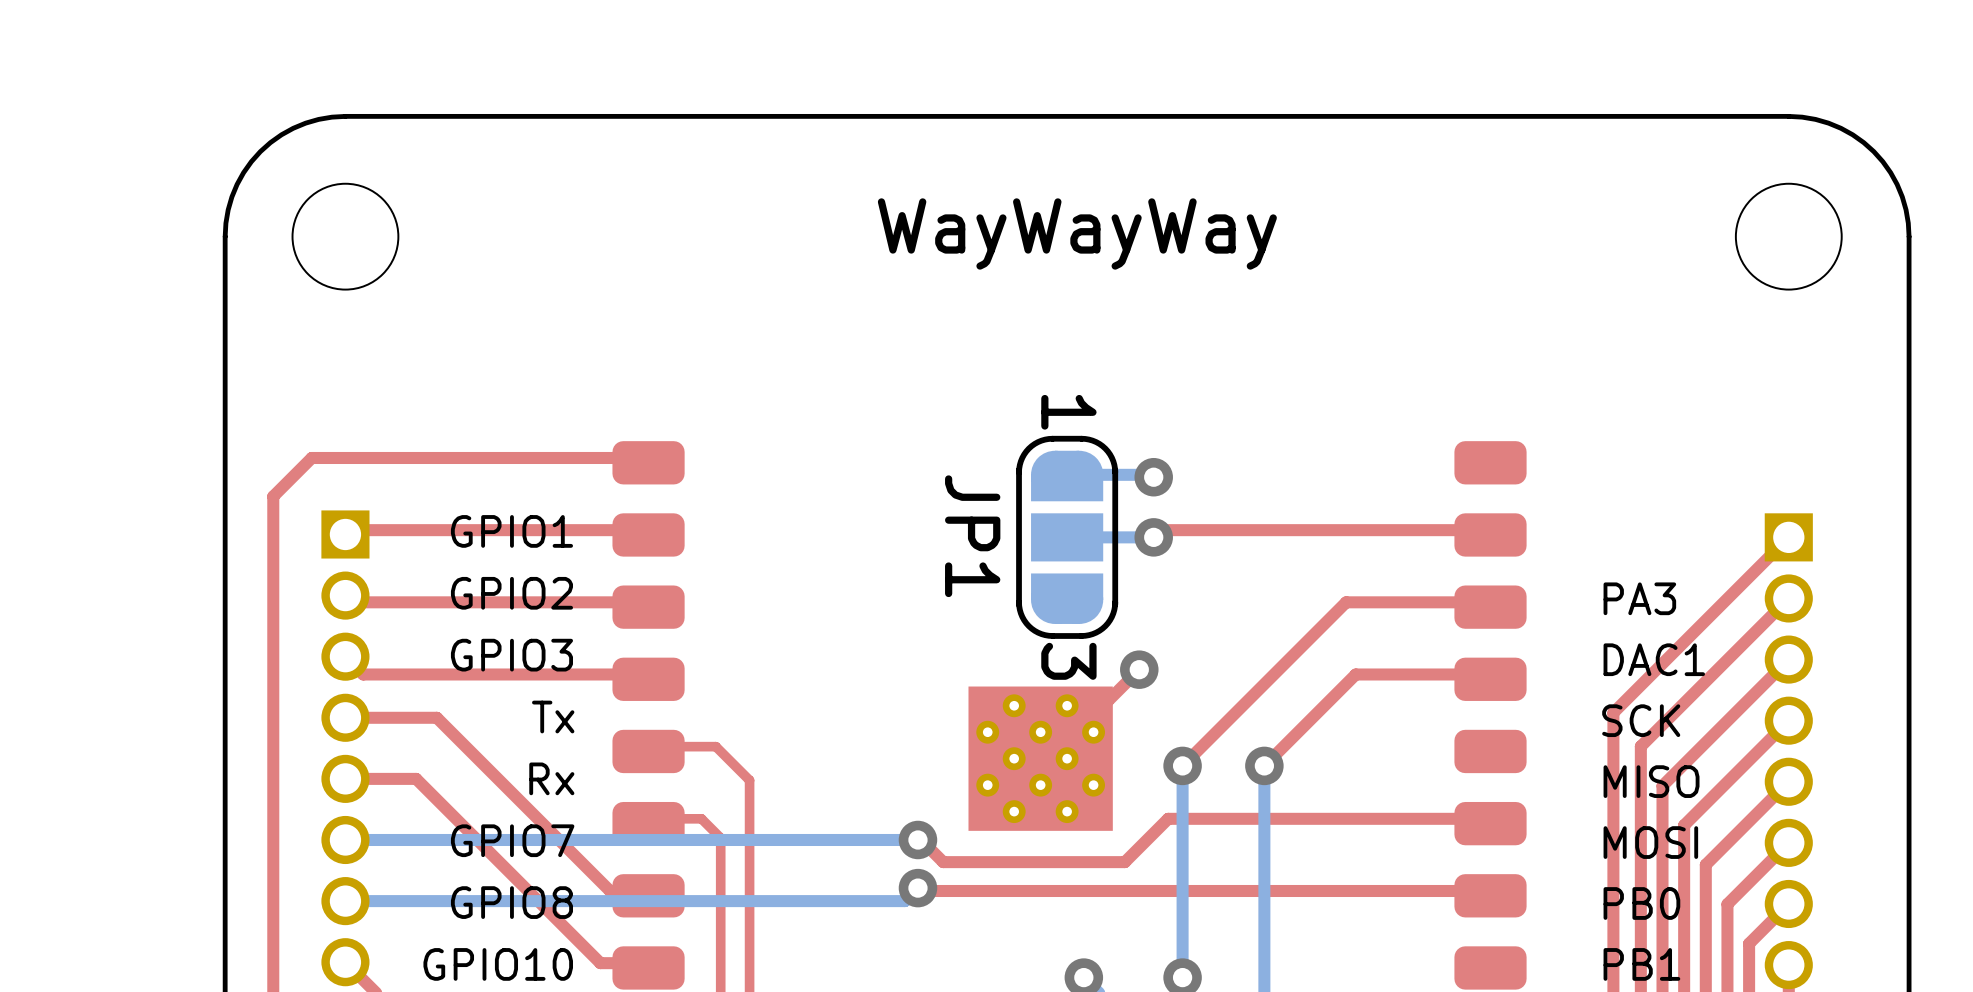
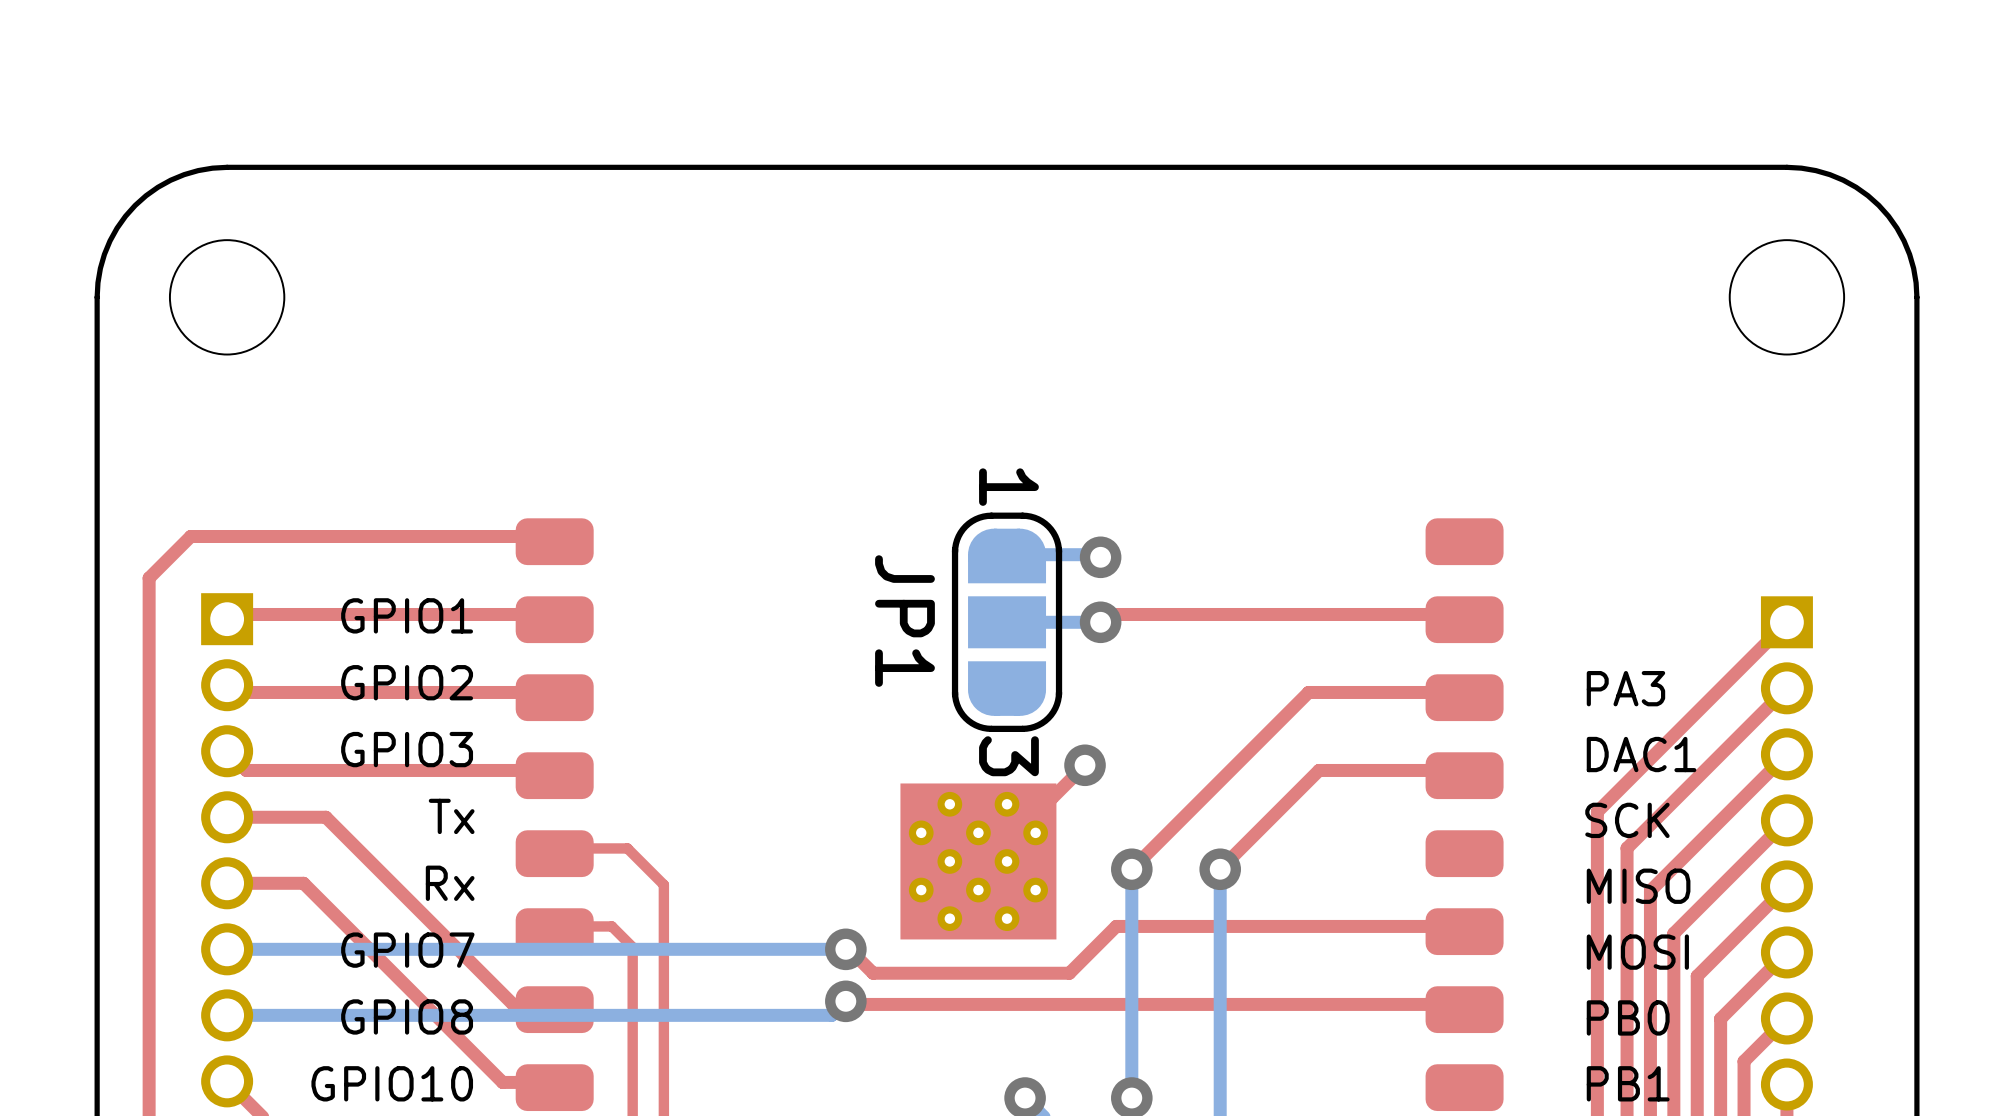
text: WayWayWay (1077, 233) -> none

